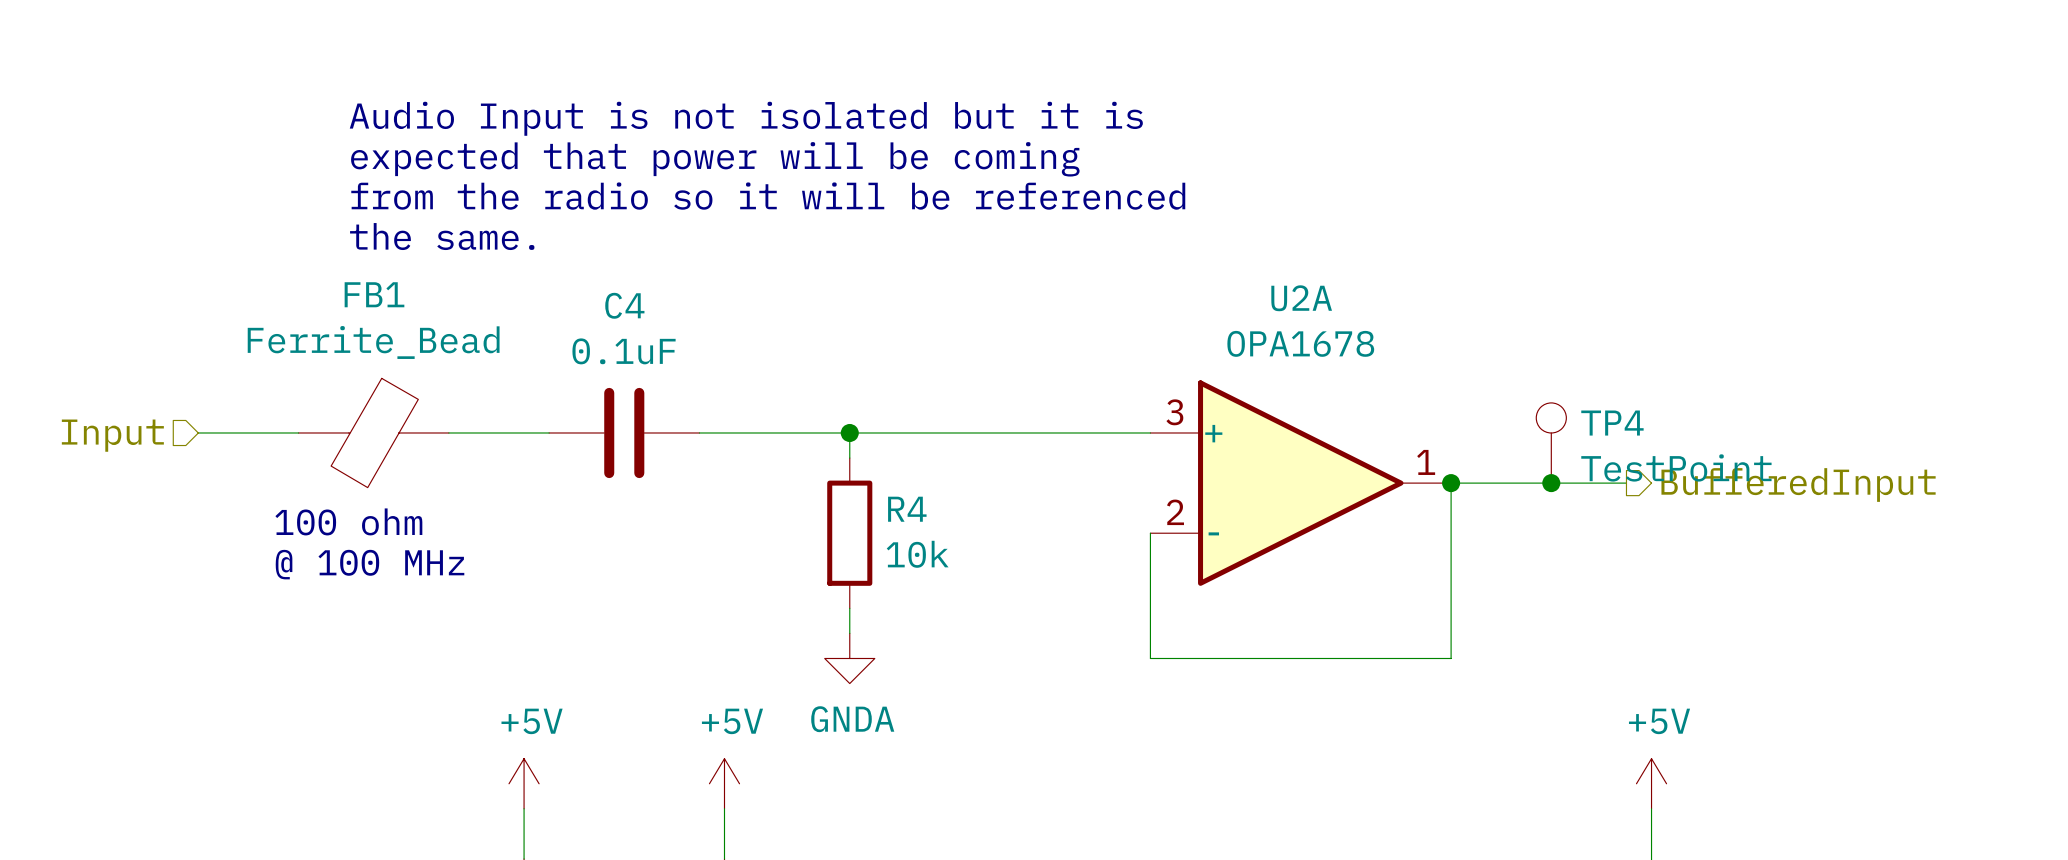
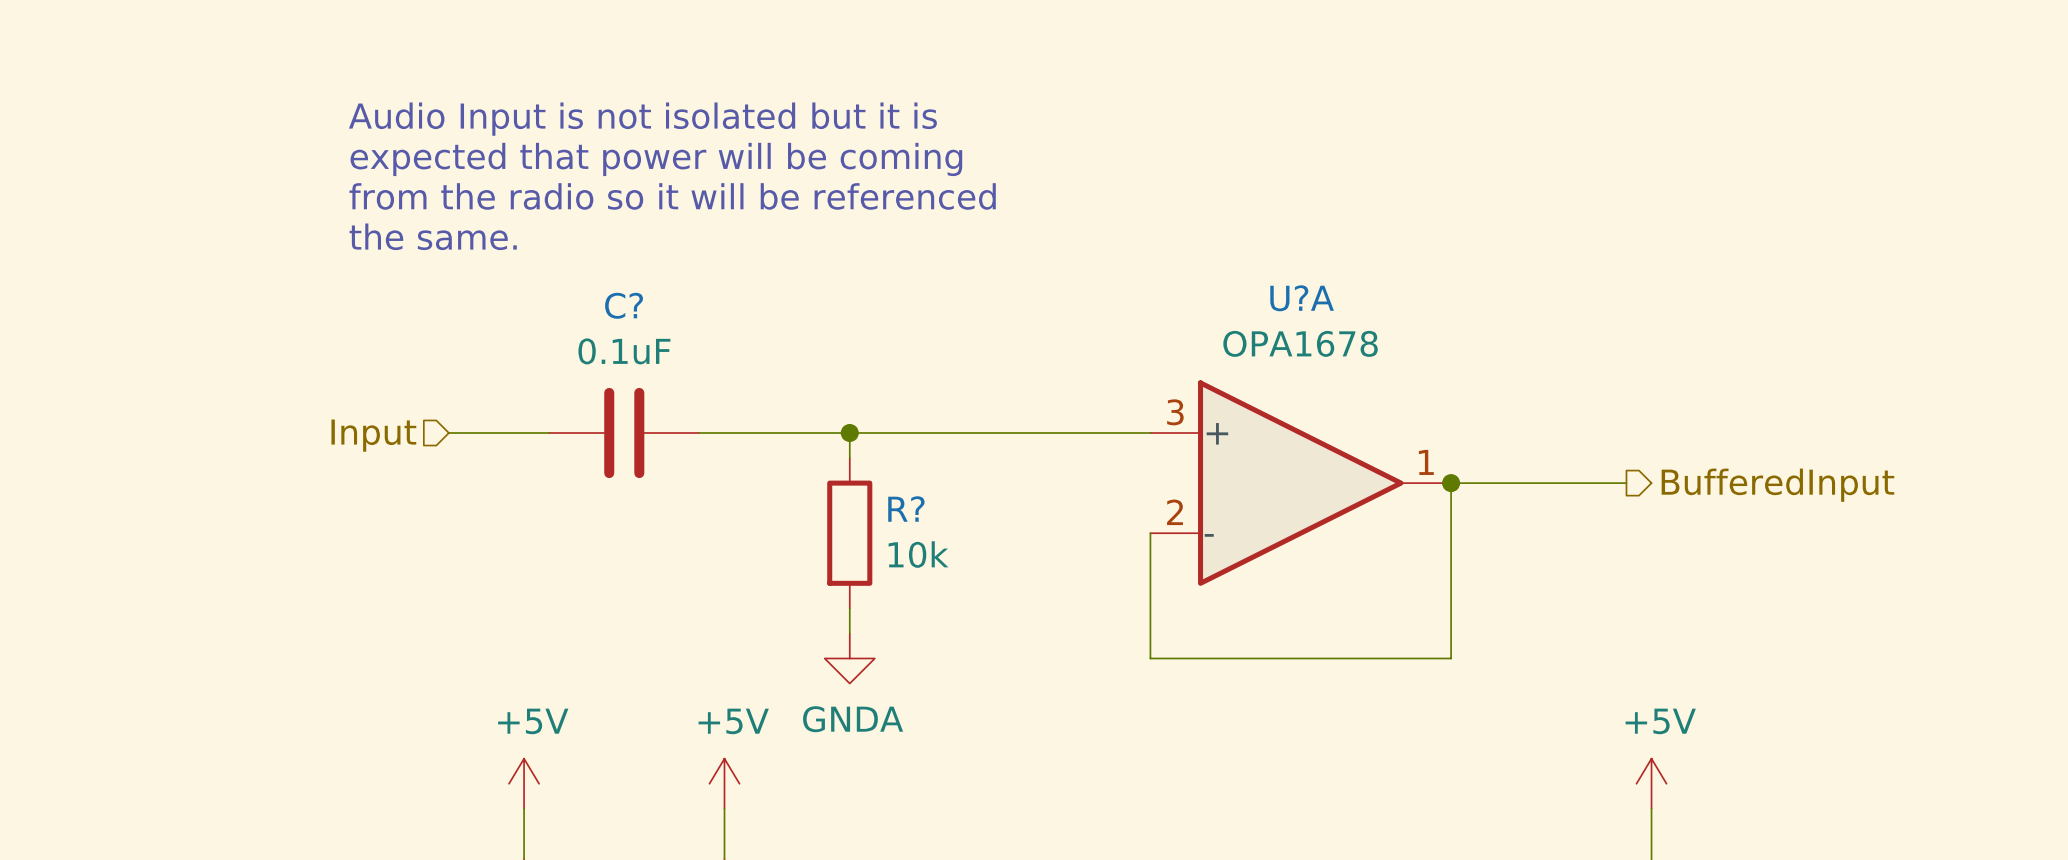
U2A name: U2A (1301, 298) -> U?A (1302, 298)
C4 name: C4 (624, 305) -> C? (624, 305)
wire: (198, 432) (298, 432) -> none
FB1: Ferrite_Bead (373, 432) -> none
hierarchical label position: Input (112, 435) -> Input (373, 435)
TP4: TestPoint (1551, 443) -> none
junction: (1551, 483) -> none
R4 name: R4 (907, 509) -> R? (906, 509)
text: 100 ohm (348, 521) -> none
text: @ 100 MHz (370, 564) -> none

